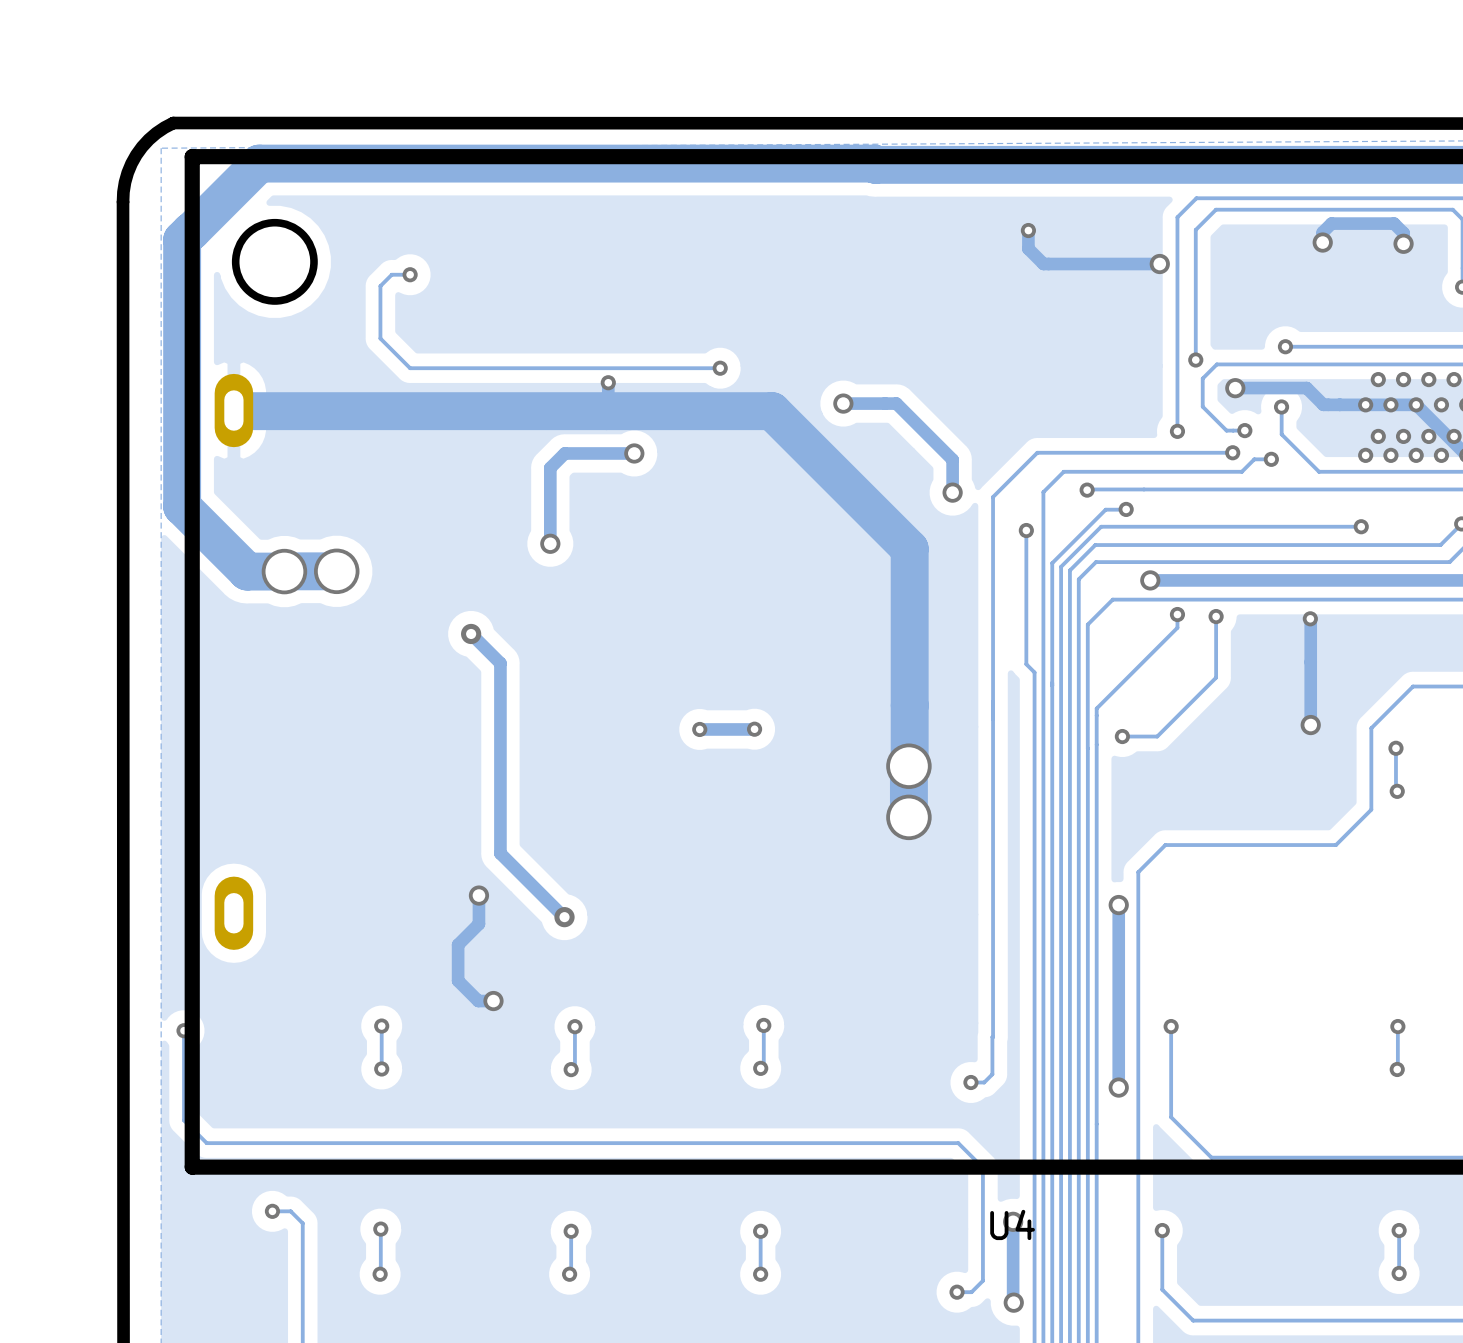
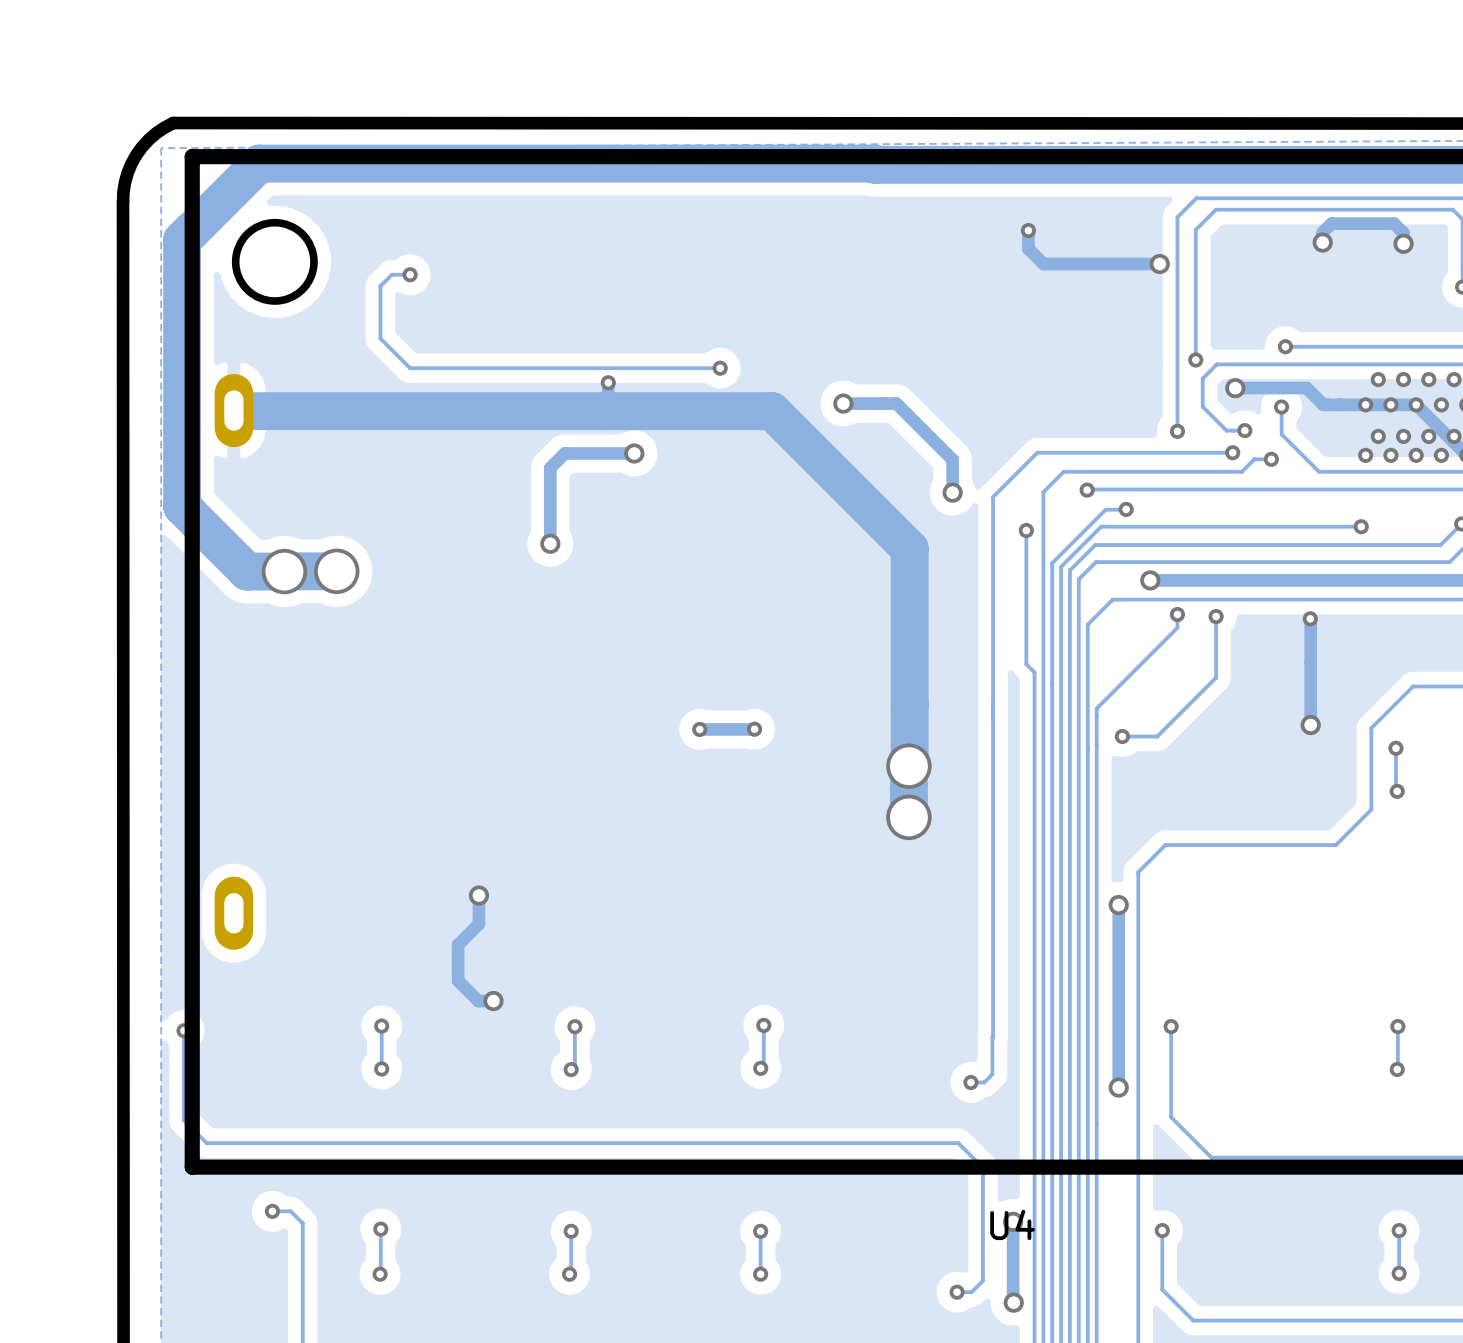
track: (471, 633) (500, 663) (500, 853) (564, 917) -> none
via: (471, 633) -> none
via: (564, 917) -> none

